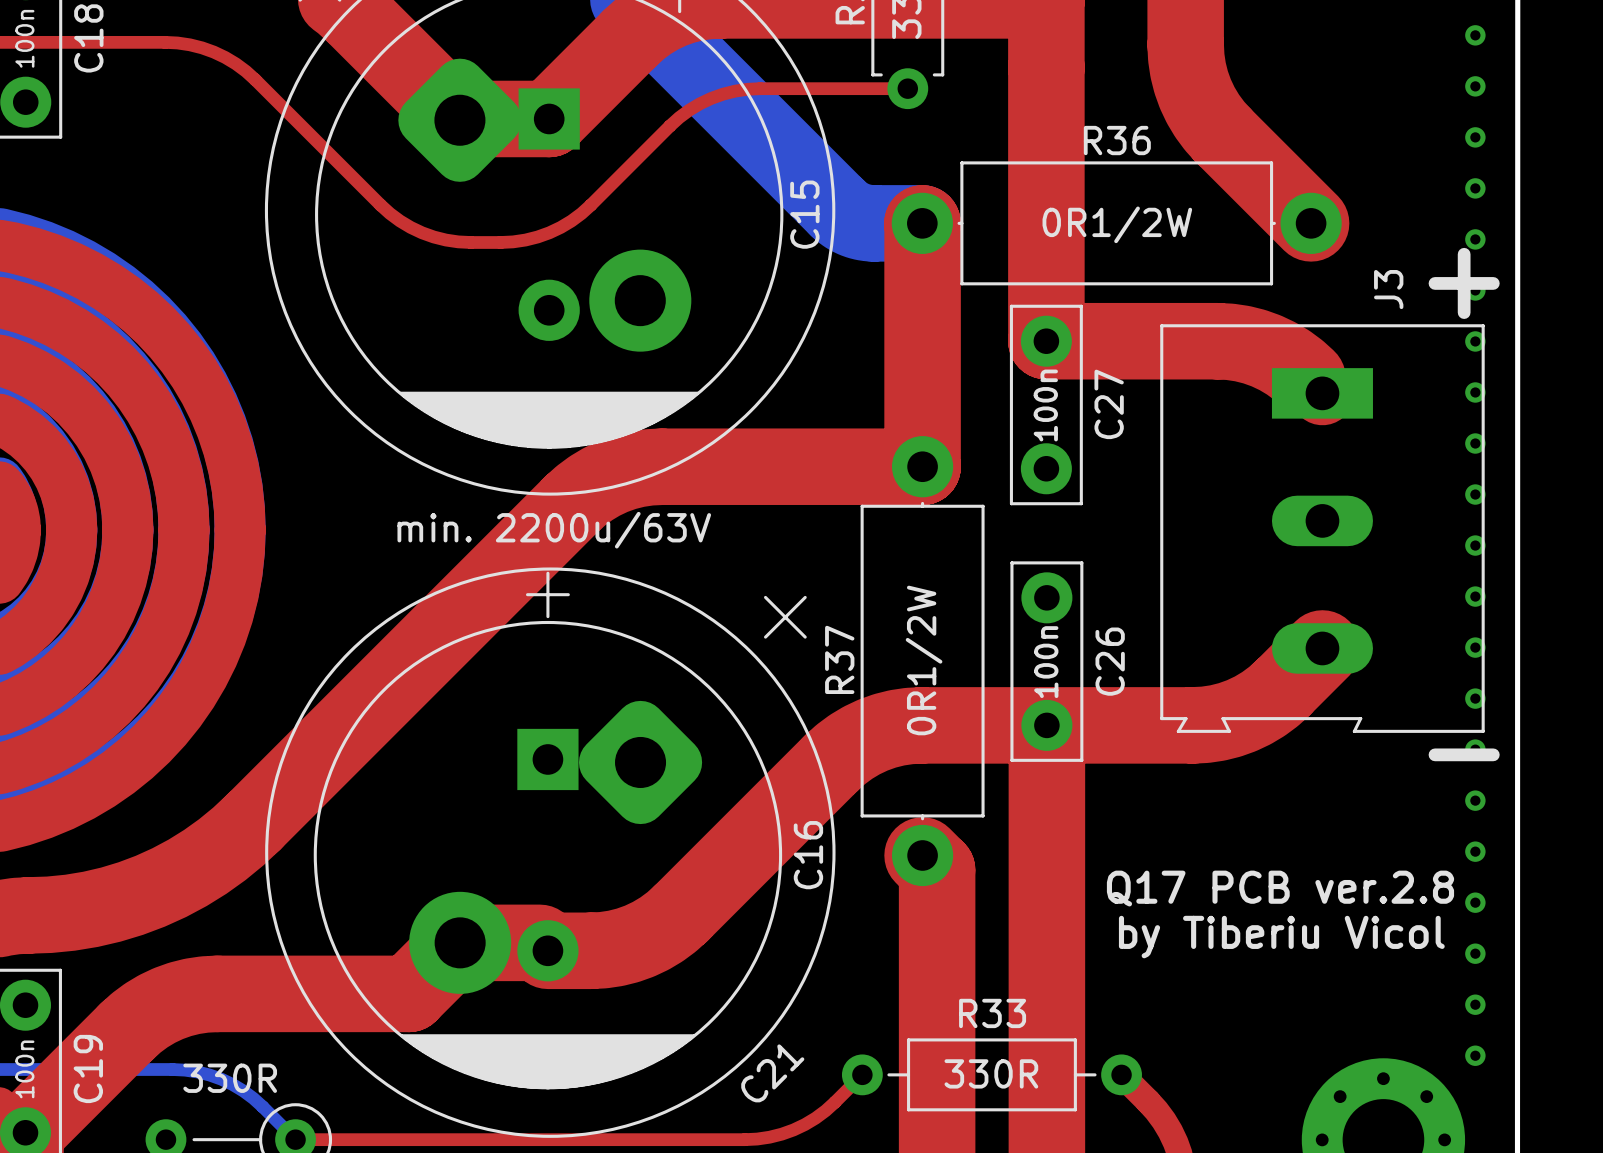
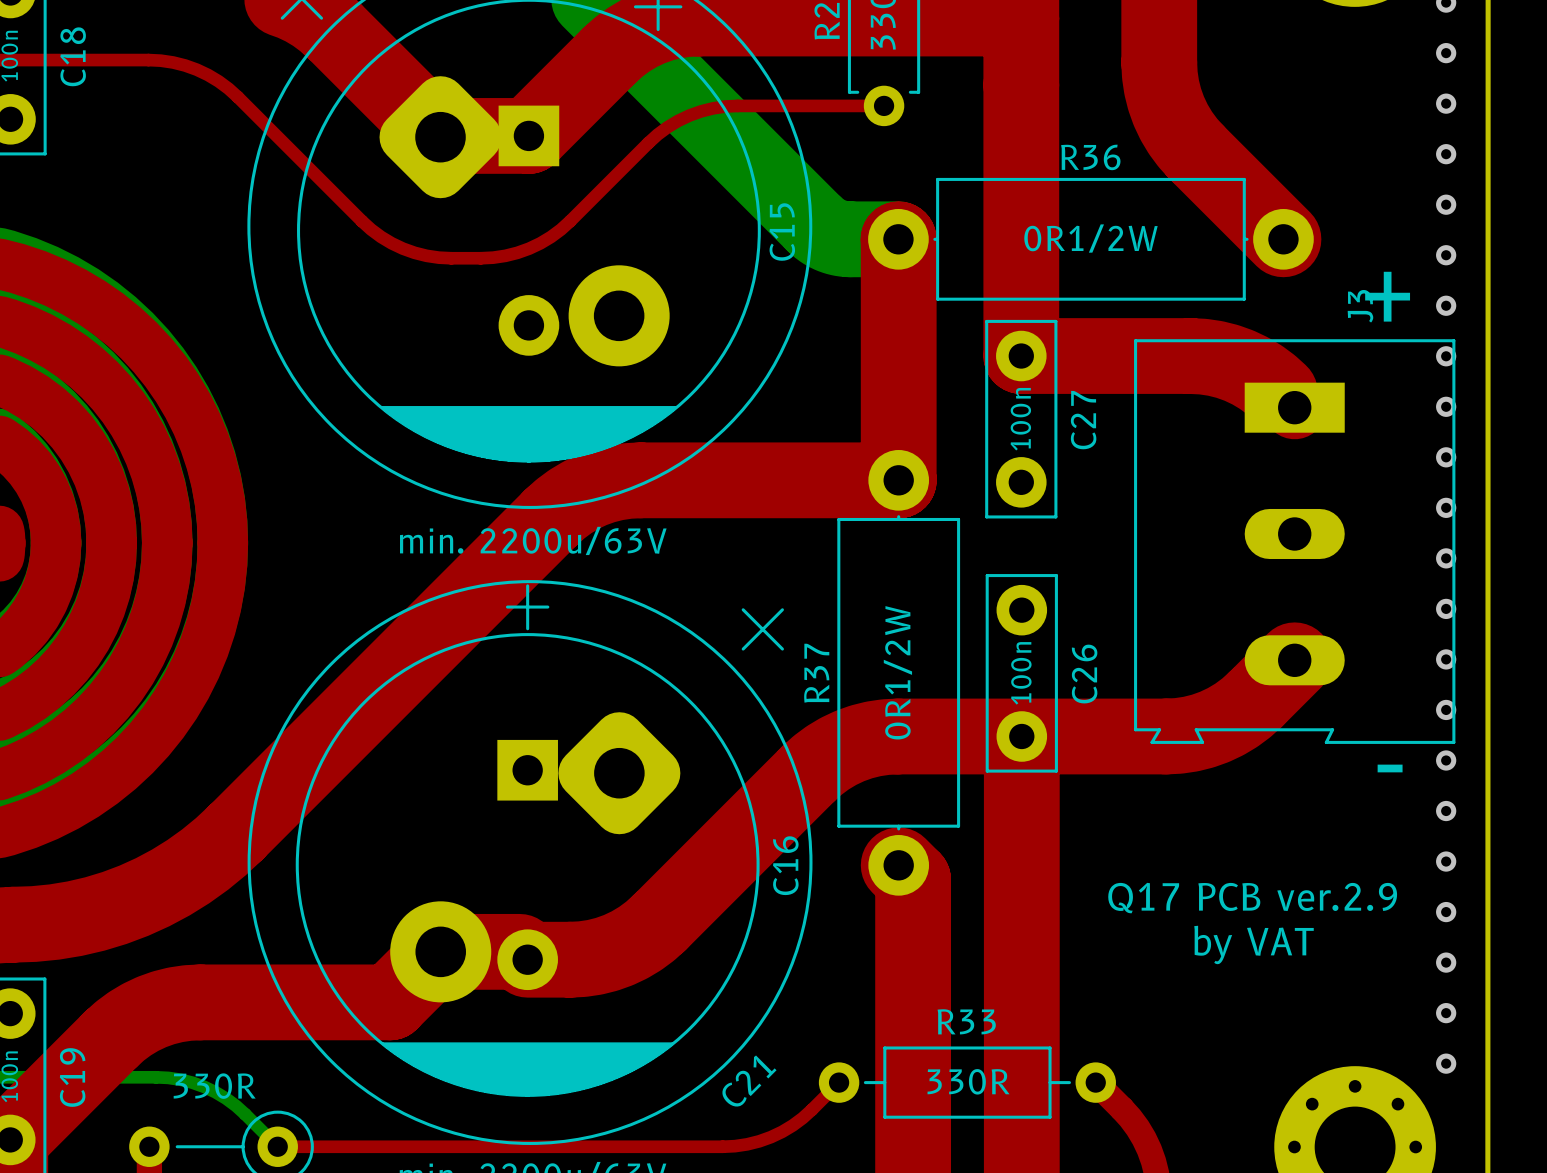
text position: + (1464, 283) -> + (1387, 296)
text position: - (1464, 754) -> - (1390, 768)
text: Q17 PCB ver.2.8 (1280, 888) -> Q17 PCB ver.2.9 (1252, 898)
text: by Tiberiu Vicol (1281, 937) -> by VAT (1254, 944)

